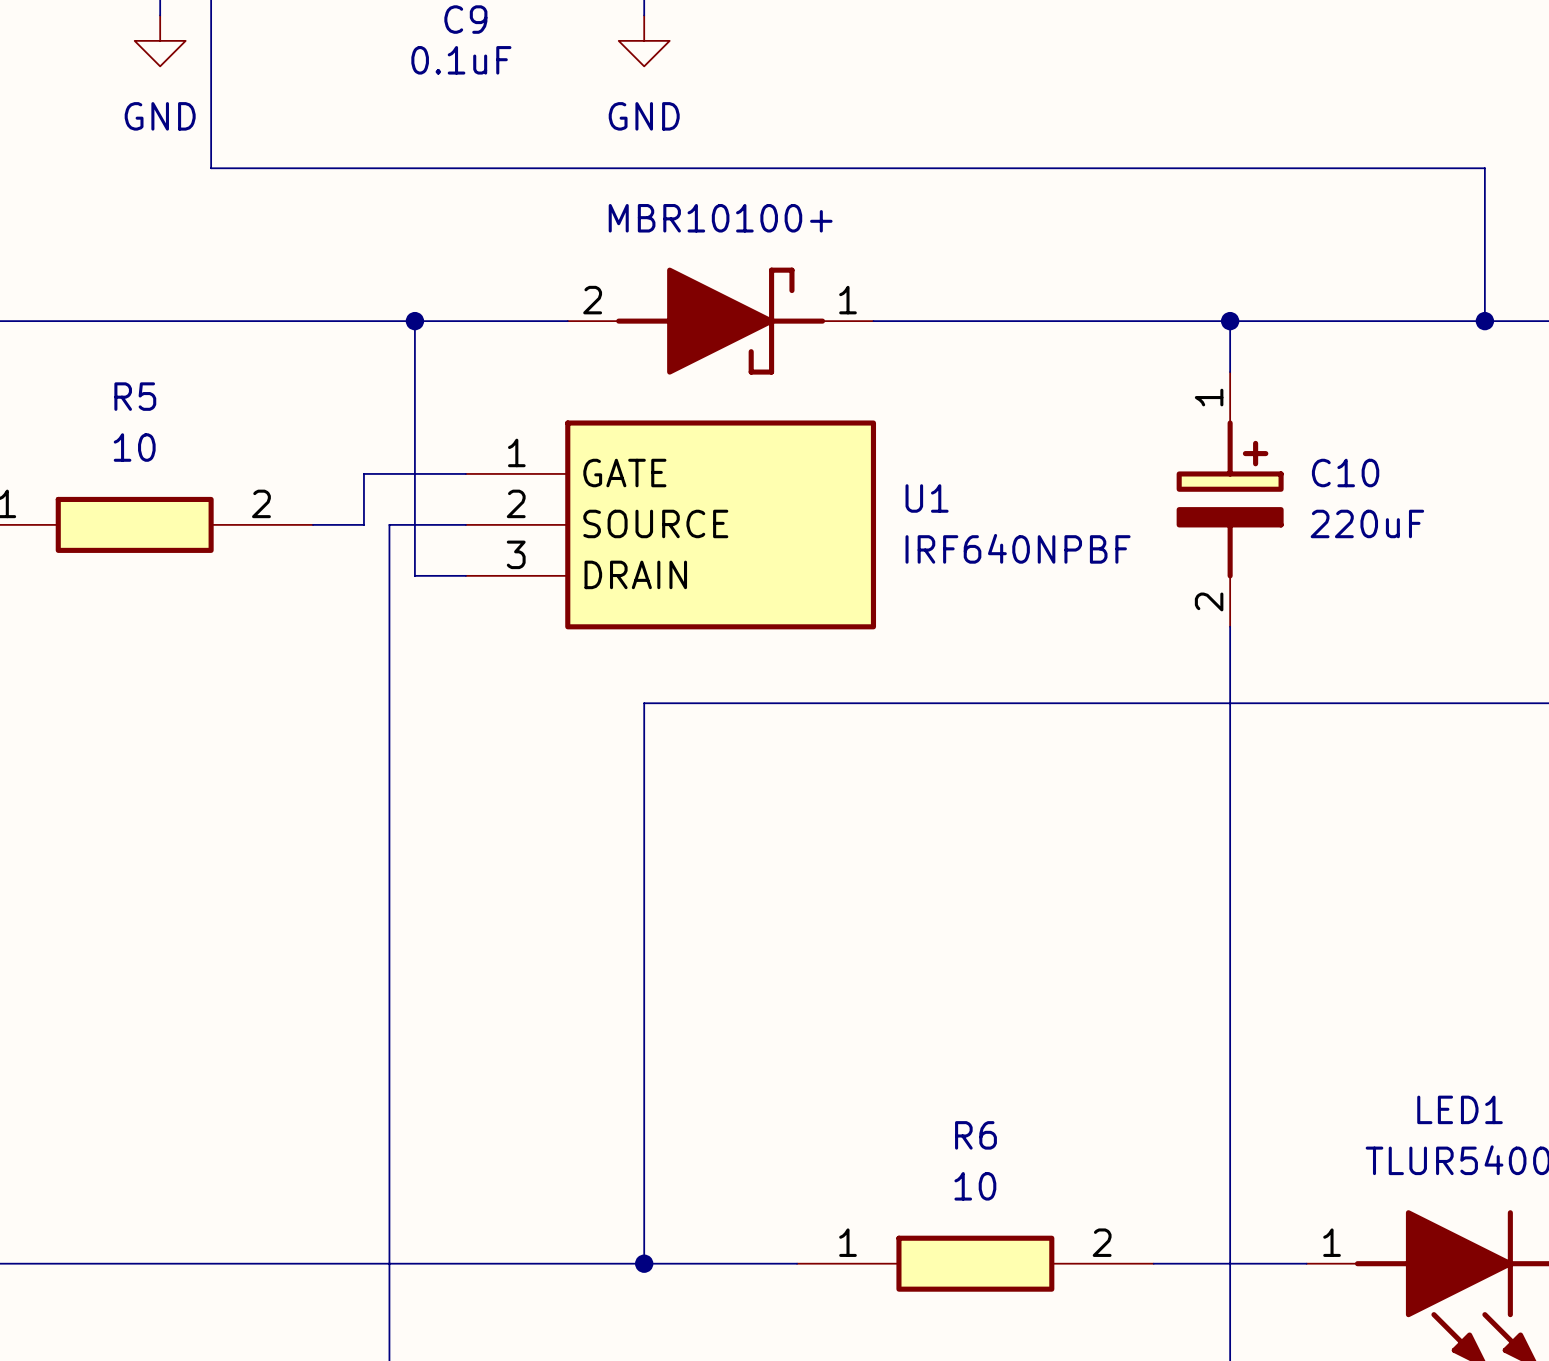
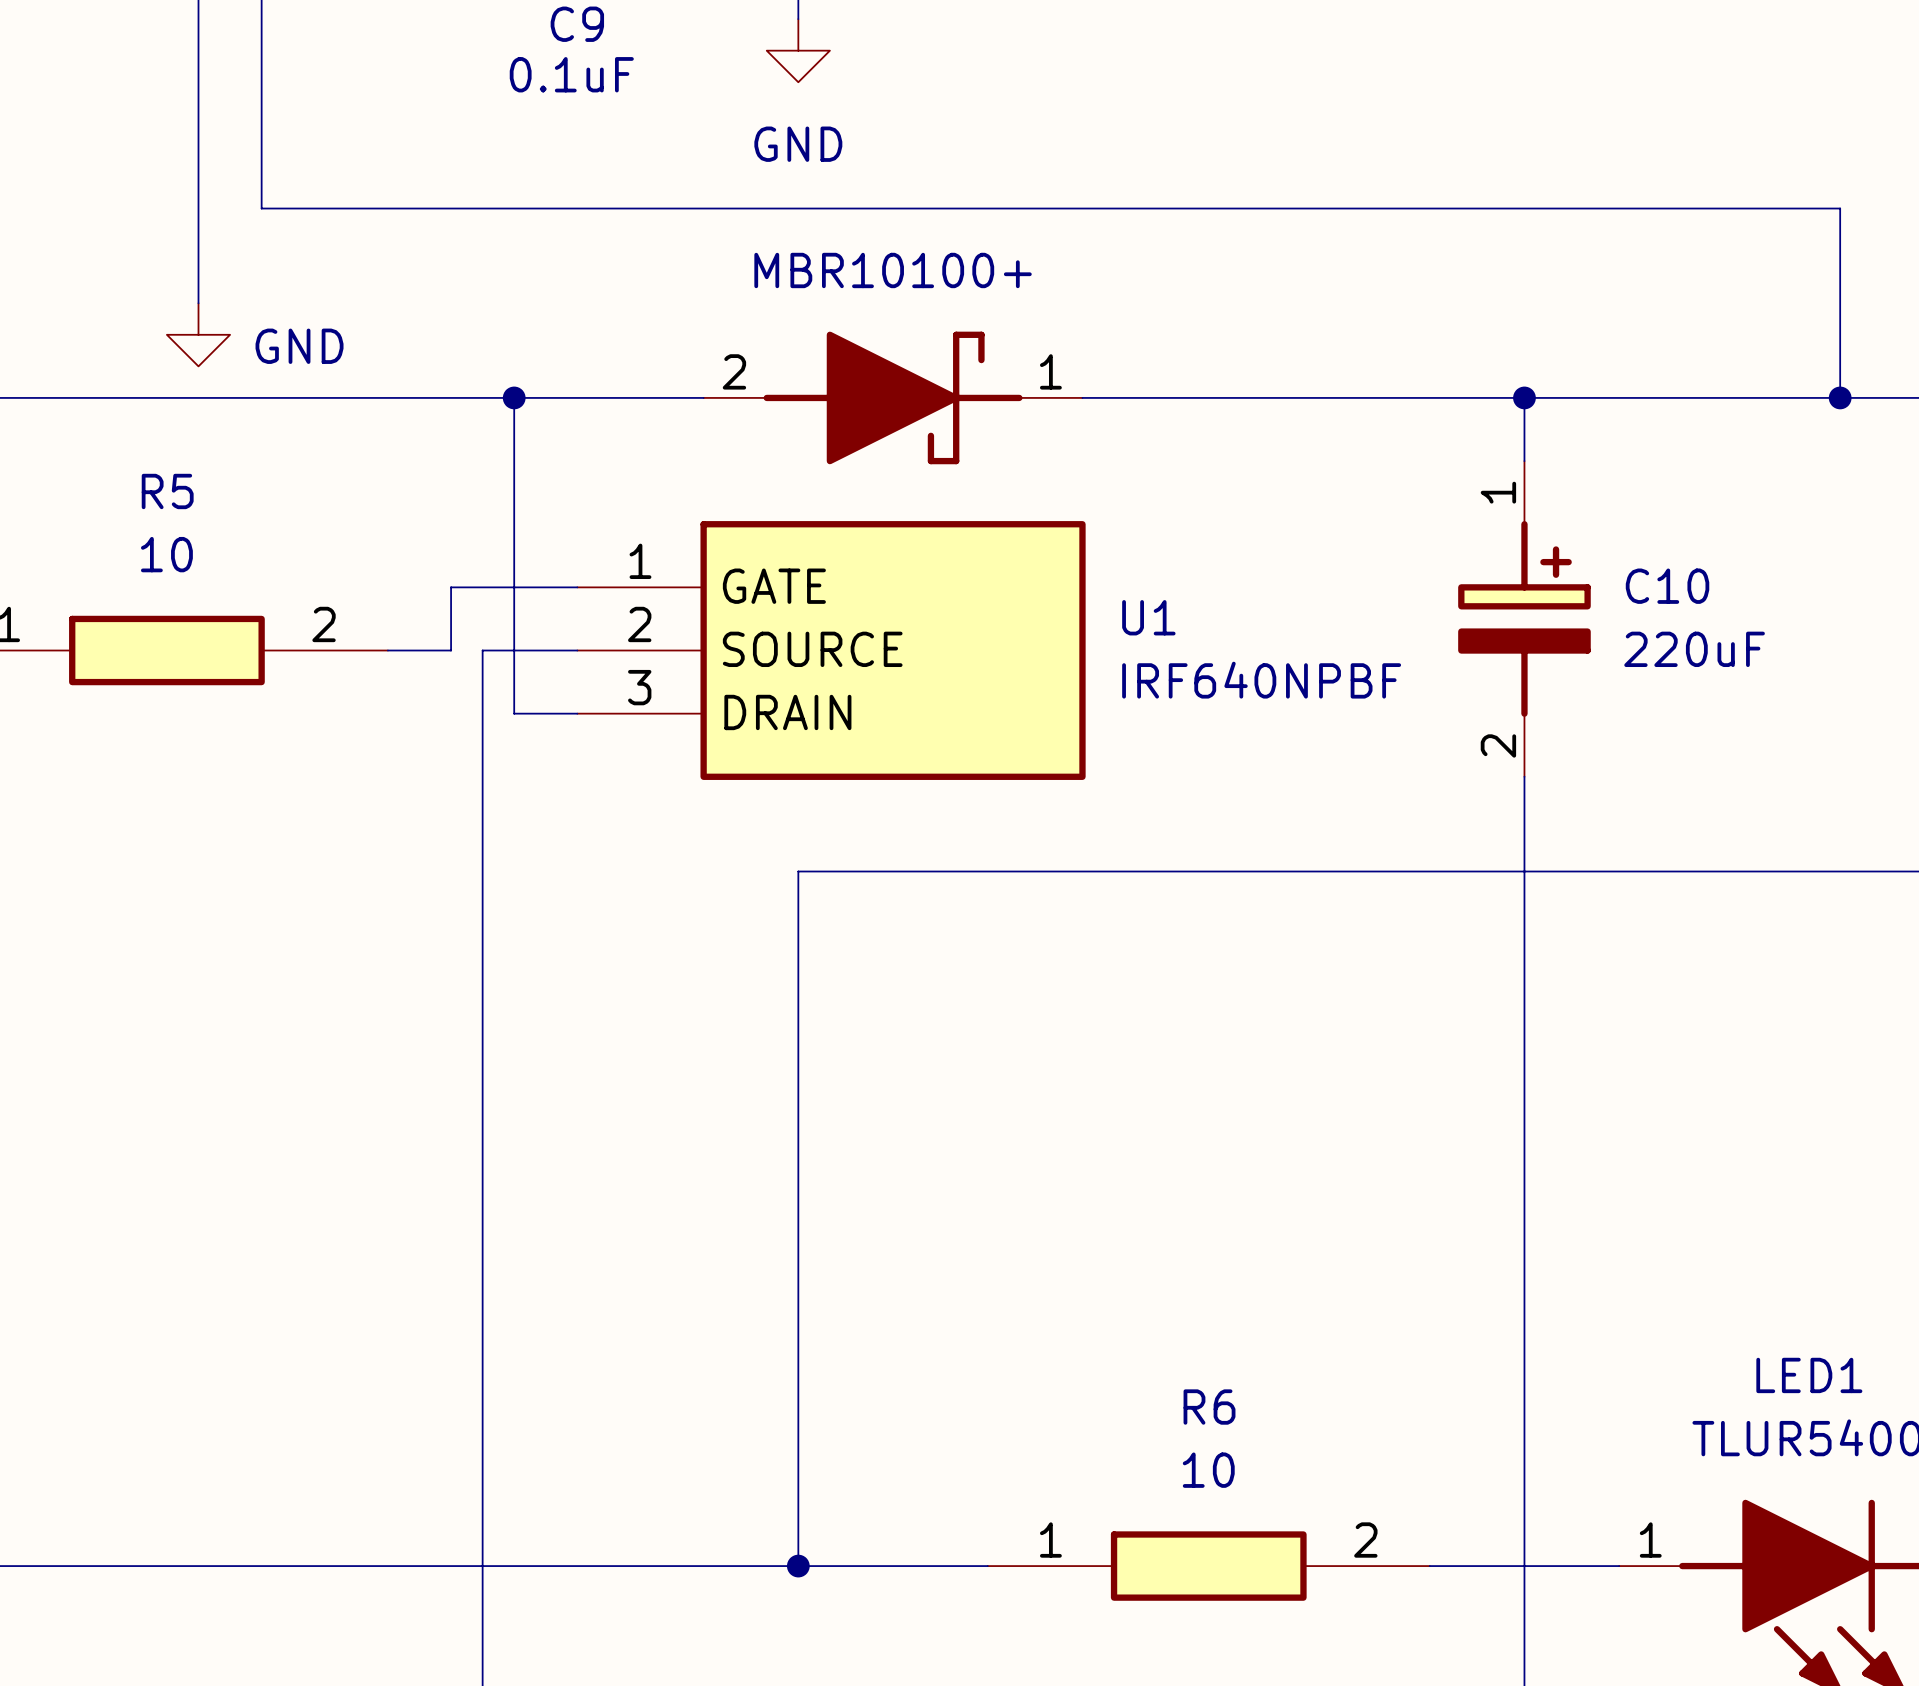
wire: none -> (198, 19) (198, 303)
power symbol position: GND (160, 40) -> GND (198, 334)
power symbol text position: GND (160, 116) -> GND (299, 346)

